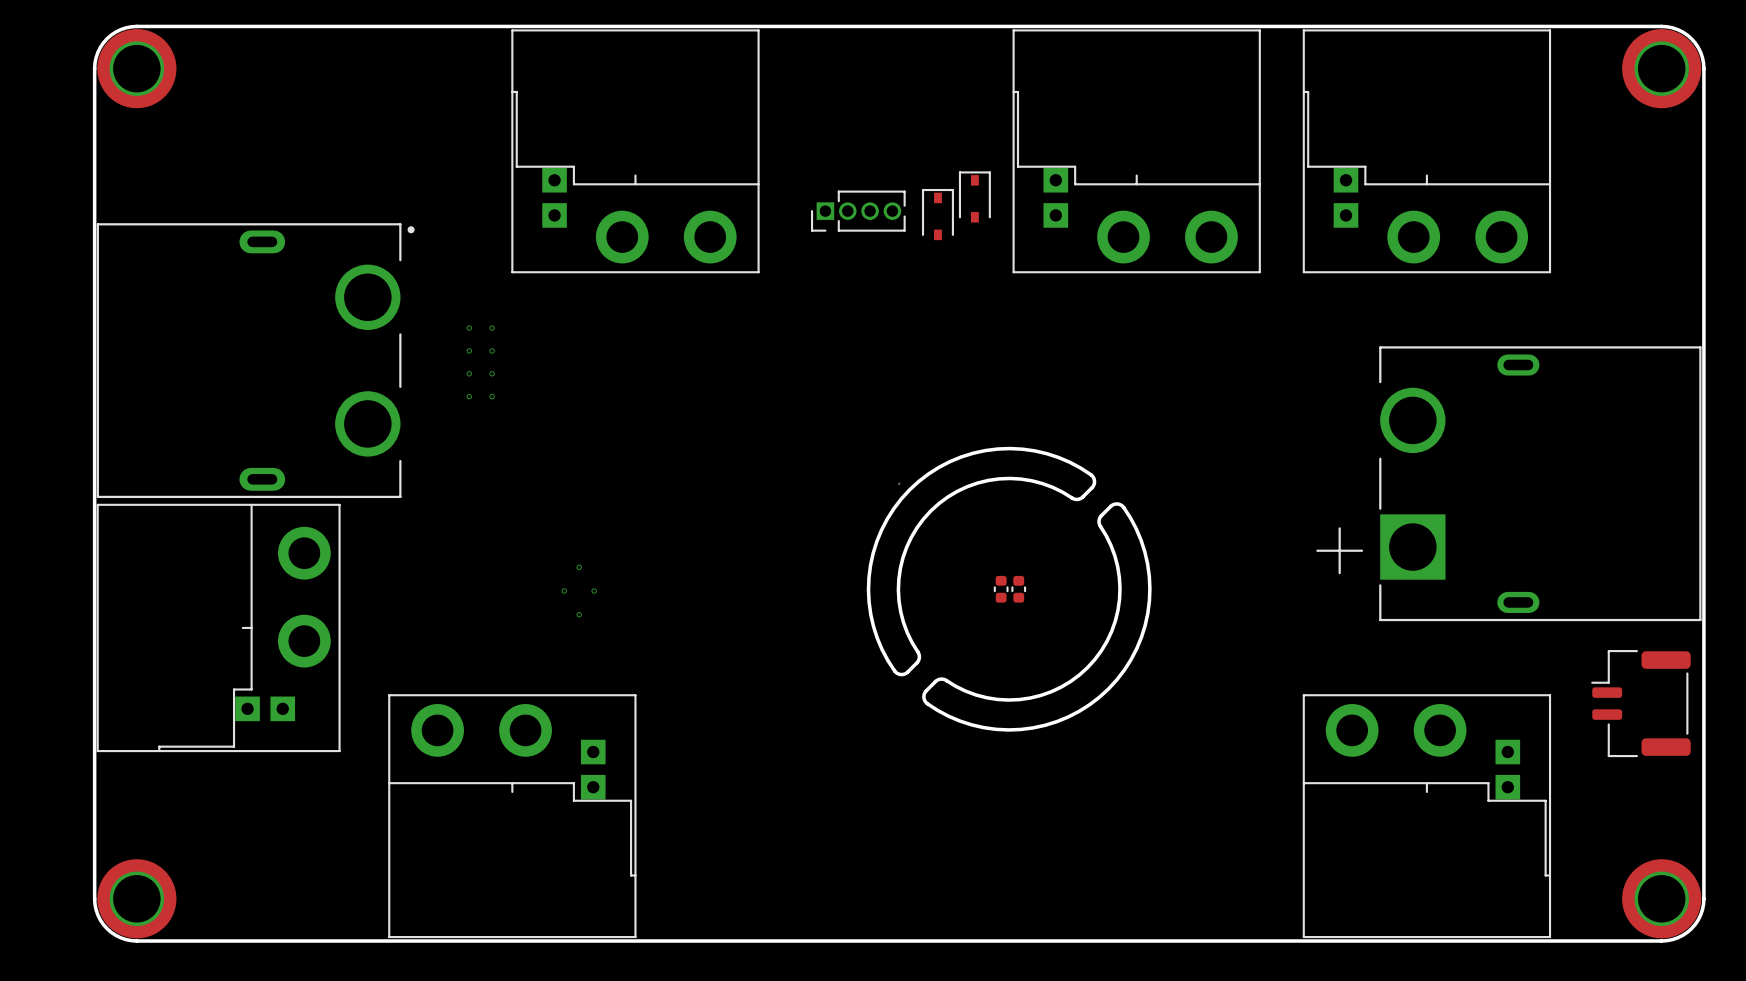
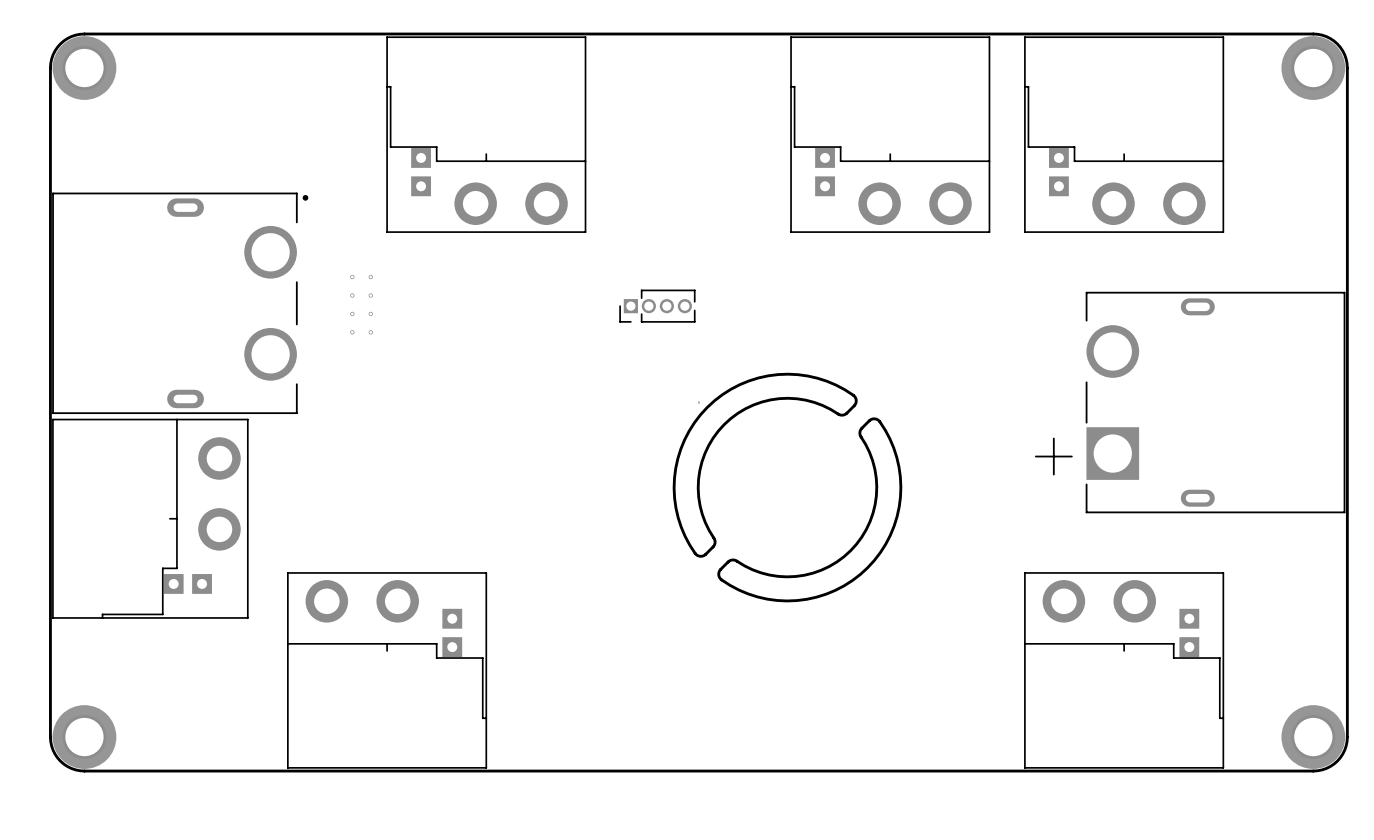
part: (974, 196) -> none
part position: (858, 211) -> (657, 306)
part: (937, 214) -> none
part: (1001, 589) -> none
part: (1018, 589) -> none
part: (579, 591) -> none
part: (1640, 703) -> none

